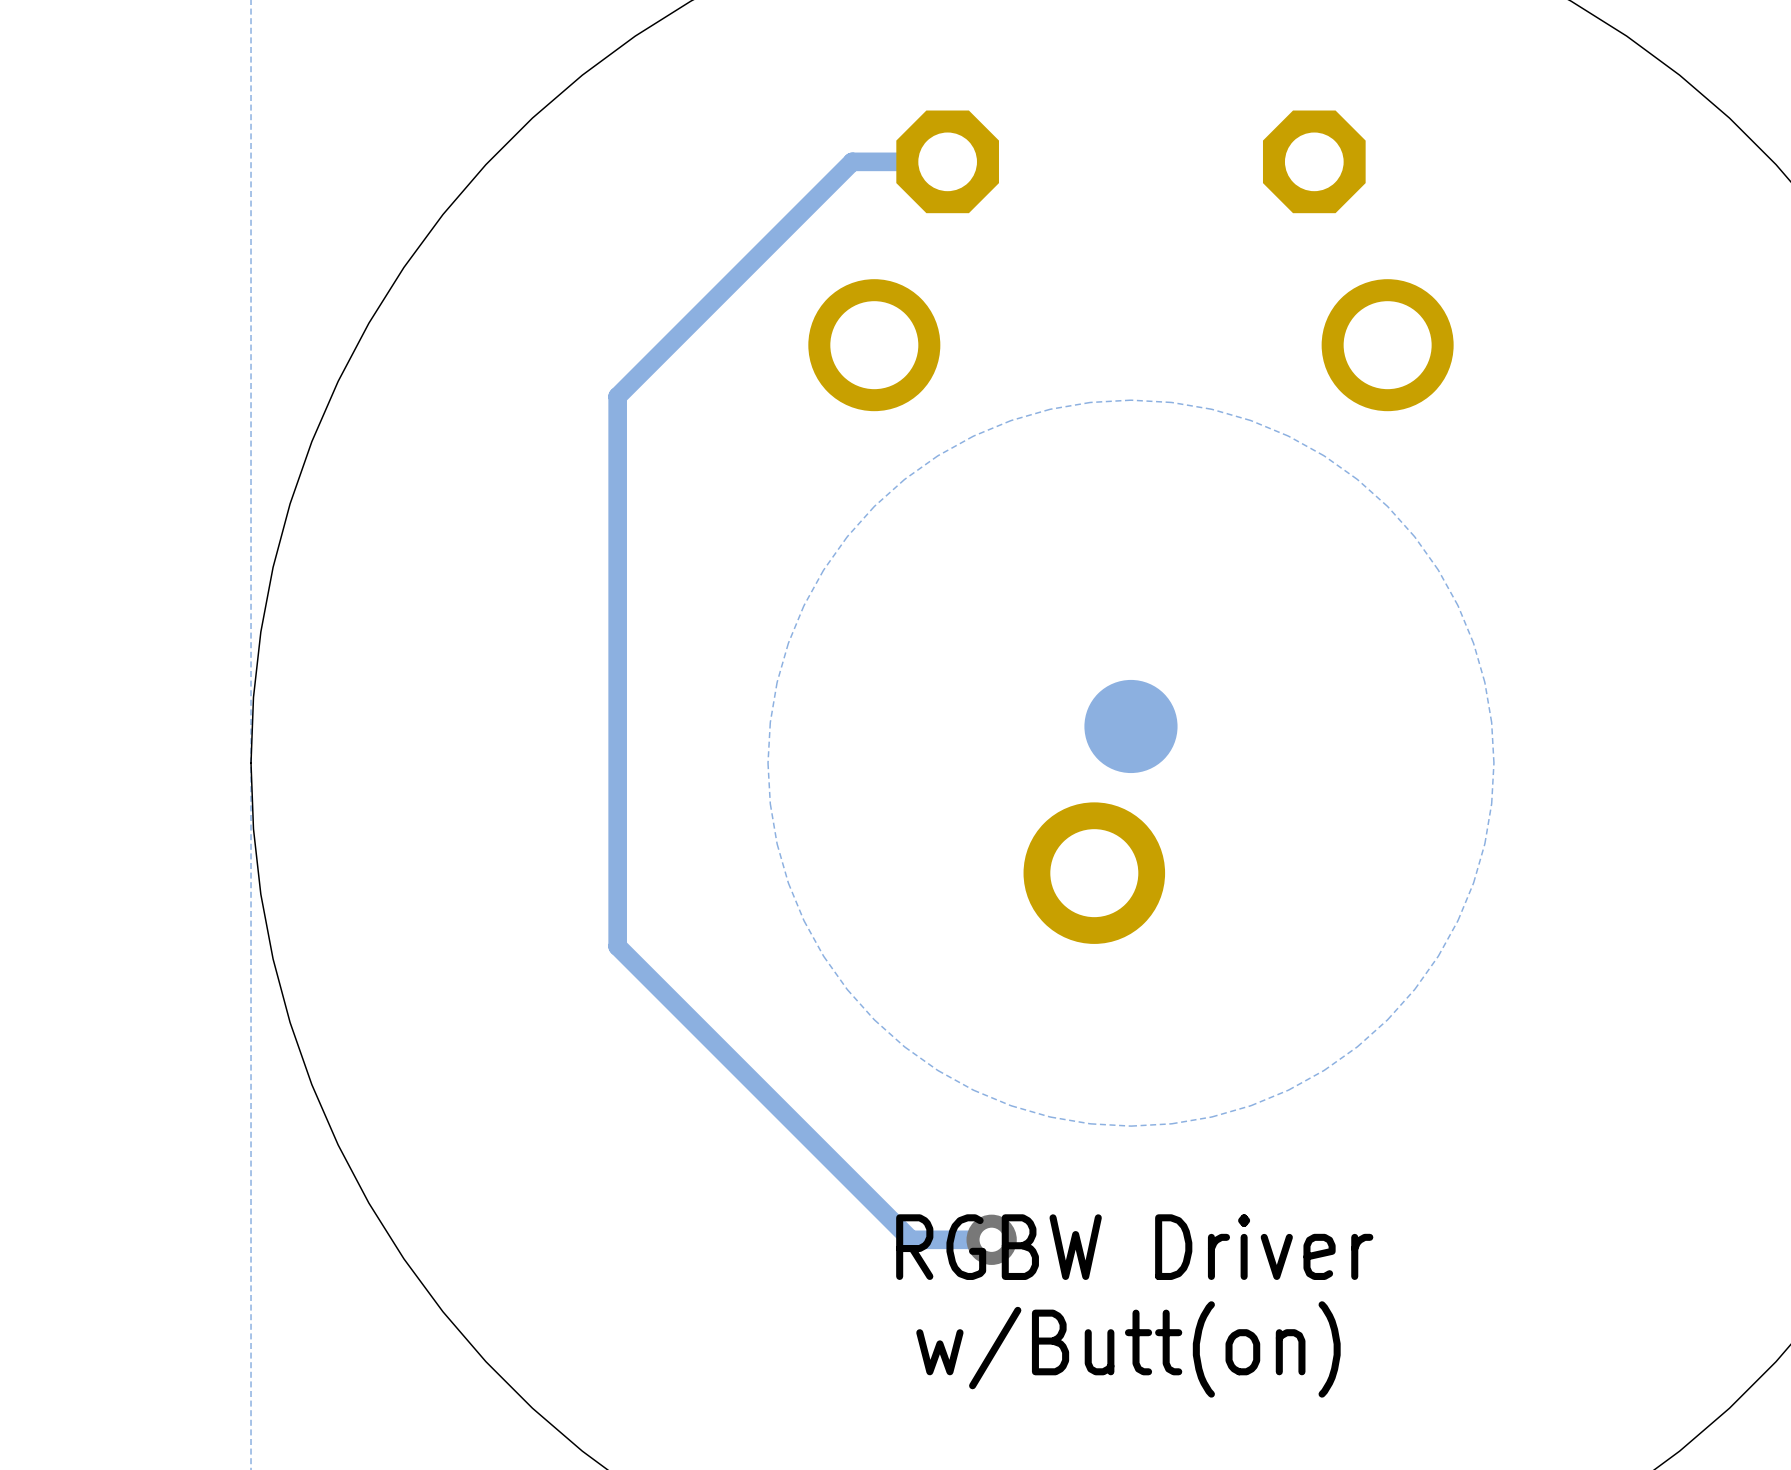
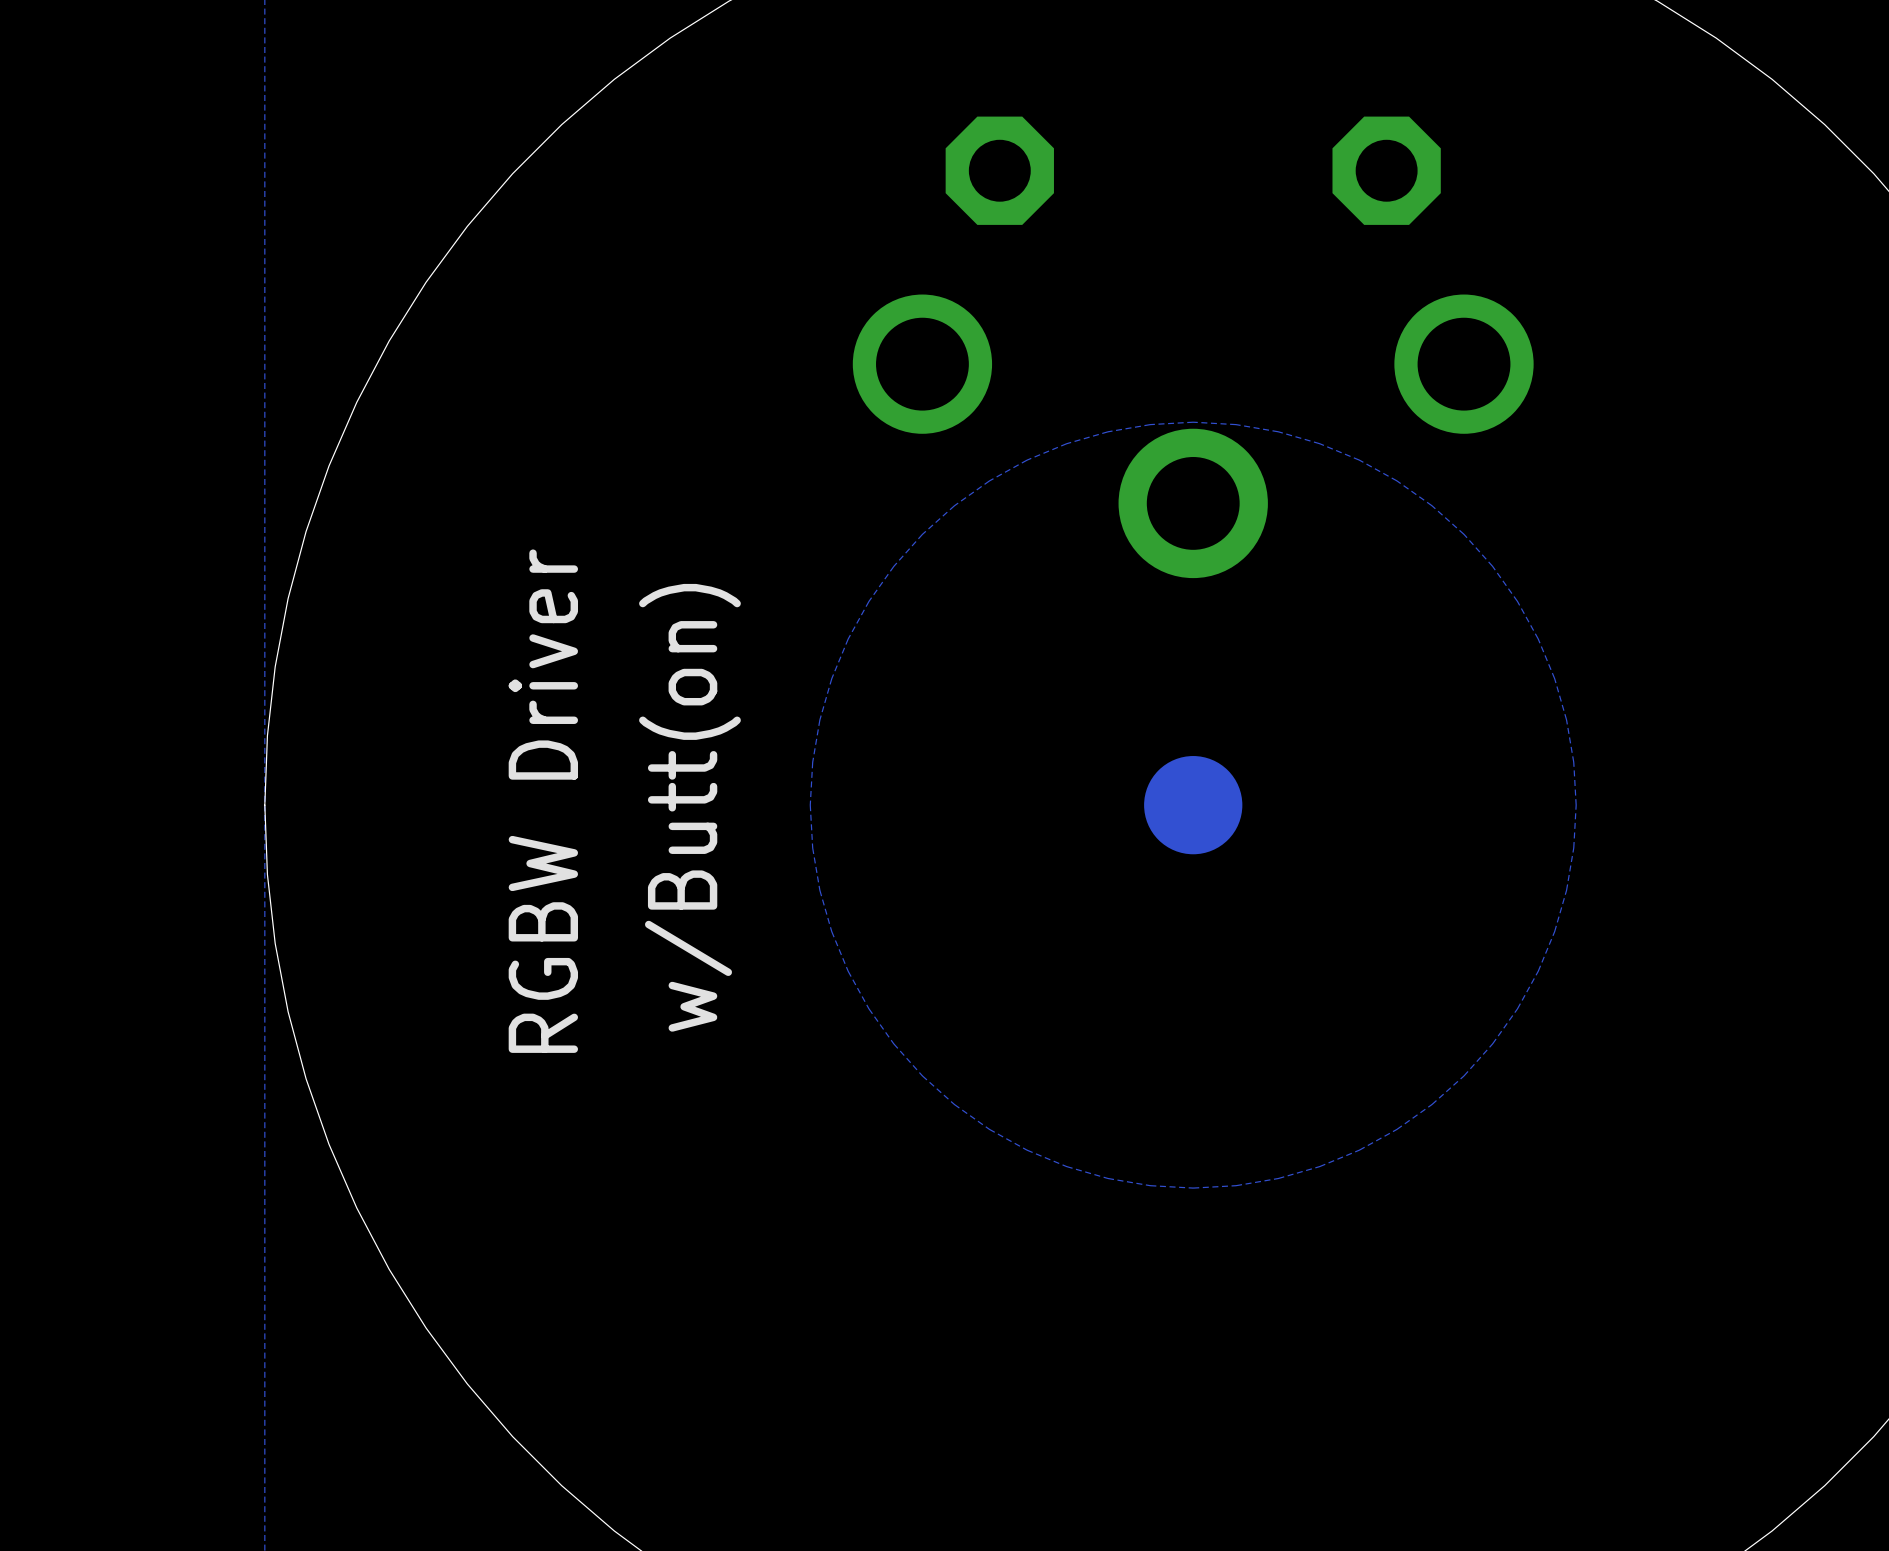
track: (947, 161) (852, 161) (617, 396) (617, 946) (910, 1239) (991, 1239) -> none
part position: (1130, 726) -> (1193, 805)
part position: (1094, 873) -> (1193, 503)
via: (991, 1239) -> none
text rotation: 0° (1134, 1247) -> 90° counterclockwise (543, 801)
text position: RGBW Driver (1134, 1247) -> RGBW Driver (543, 801)
text rotation: 0° (1128, 1349) -> 90° counterclockwise (689, 807)
text position: w/Butt(on) (1128, 1349) -> w/Butt(on) (689, 807)

